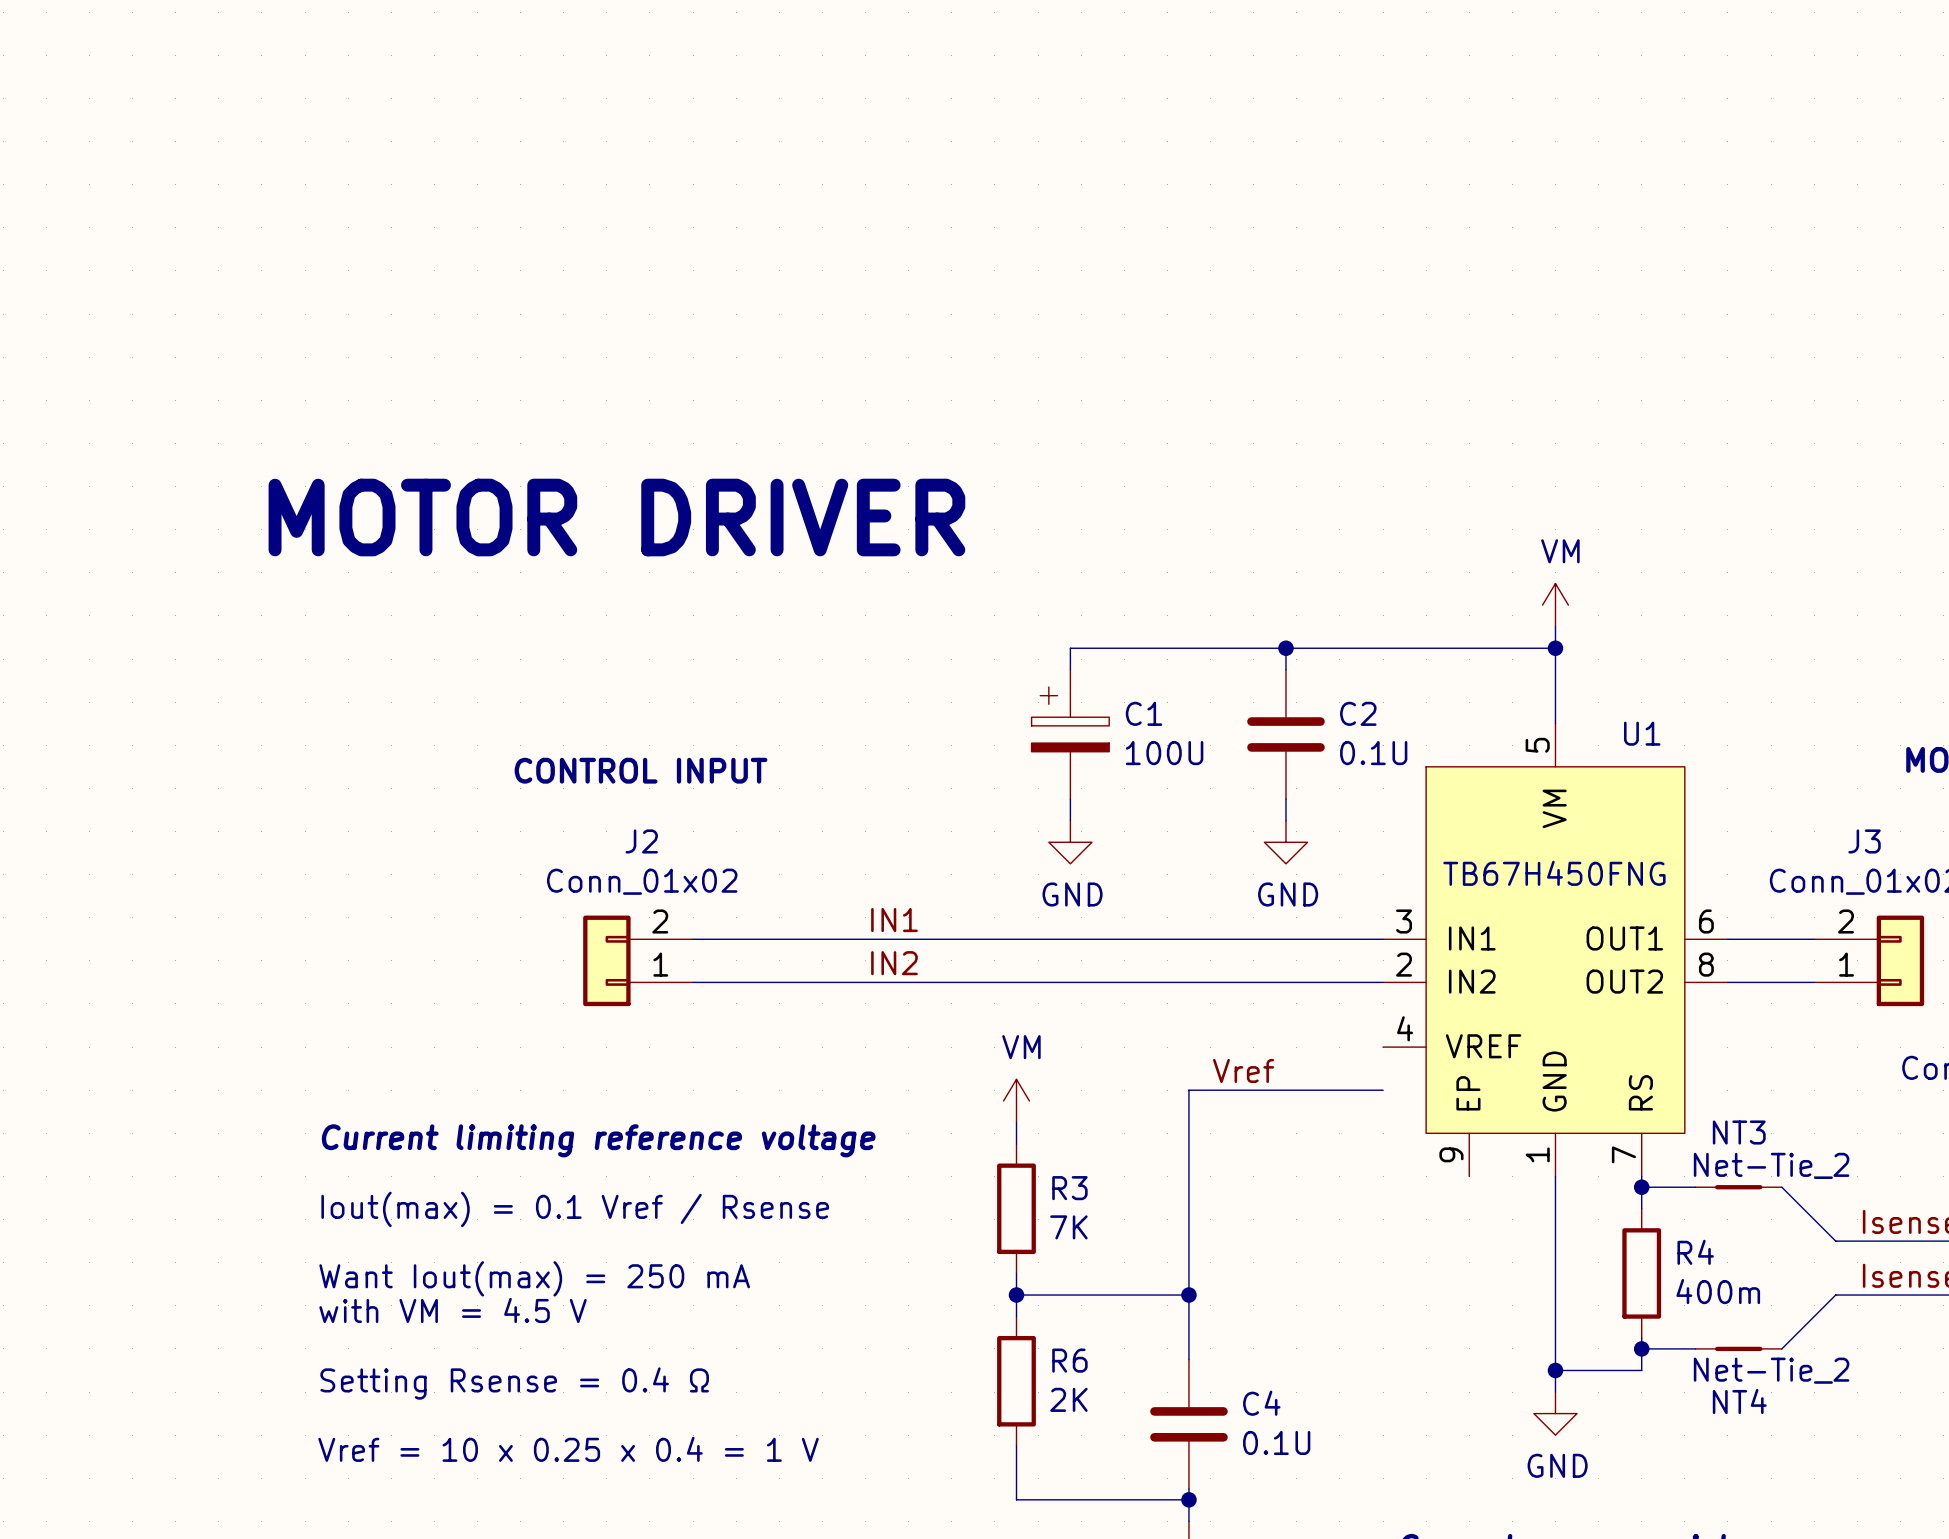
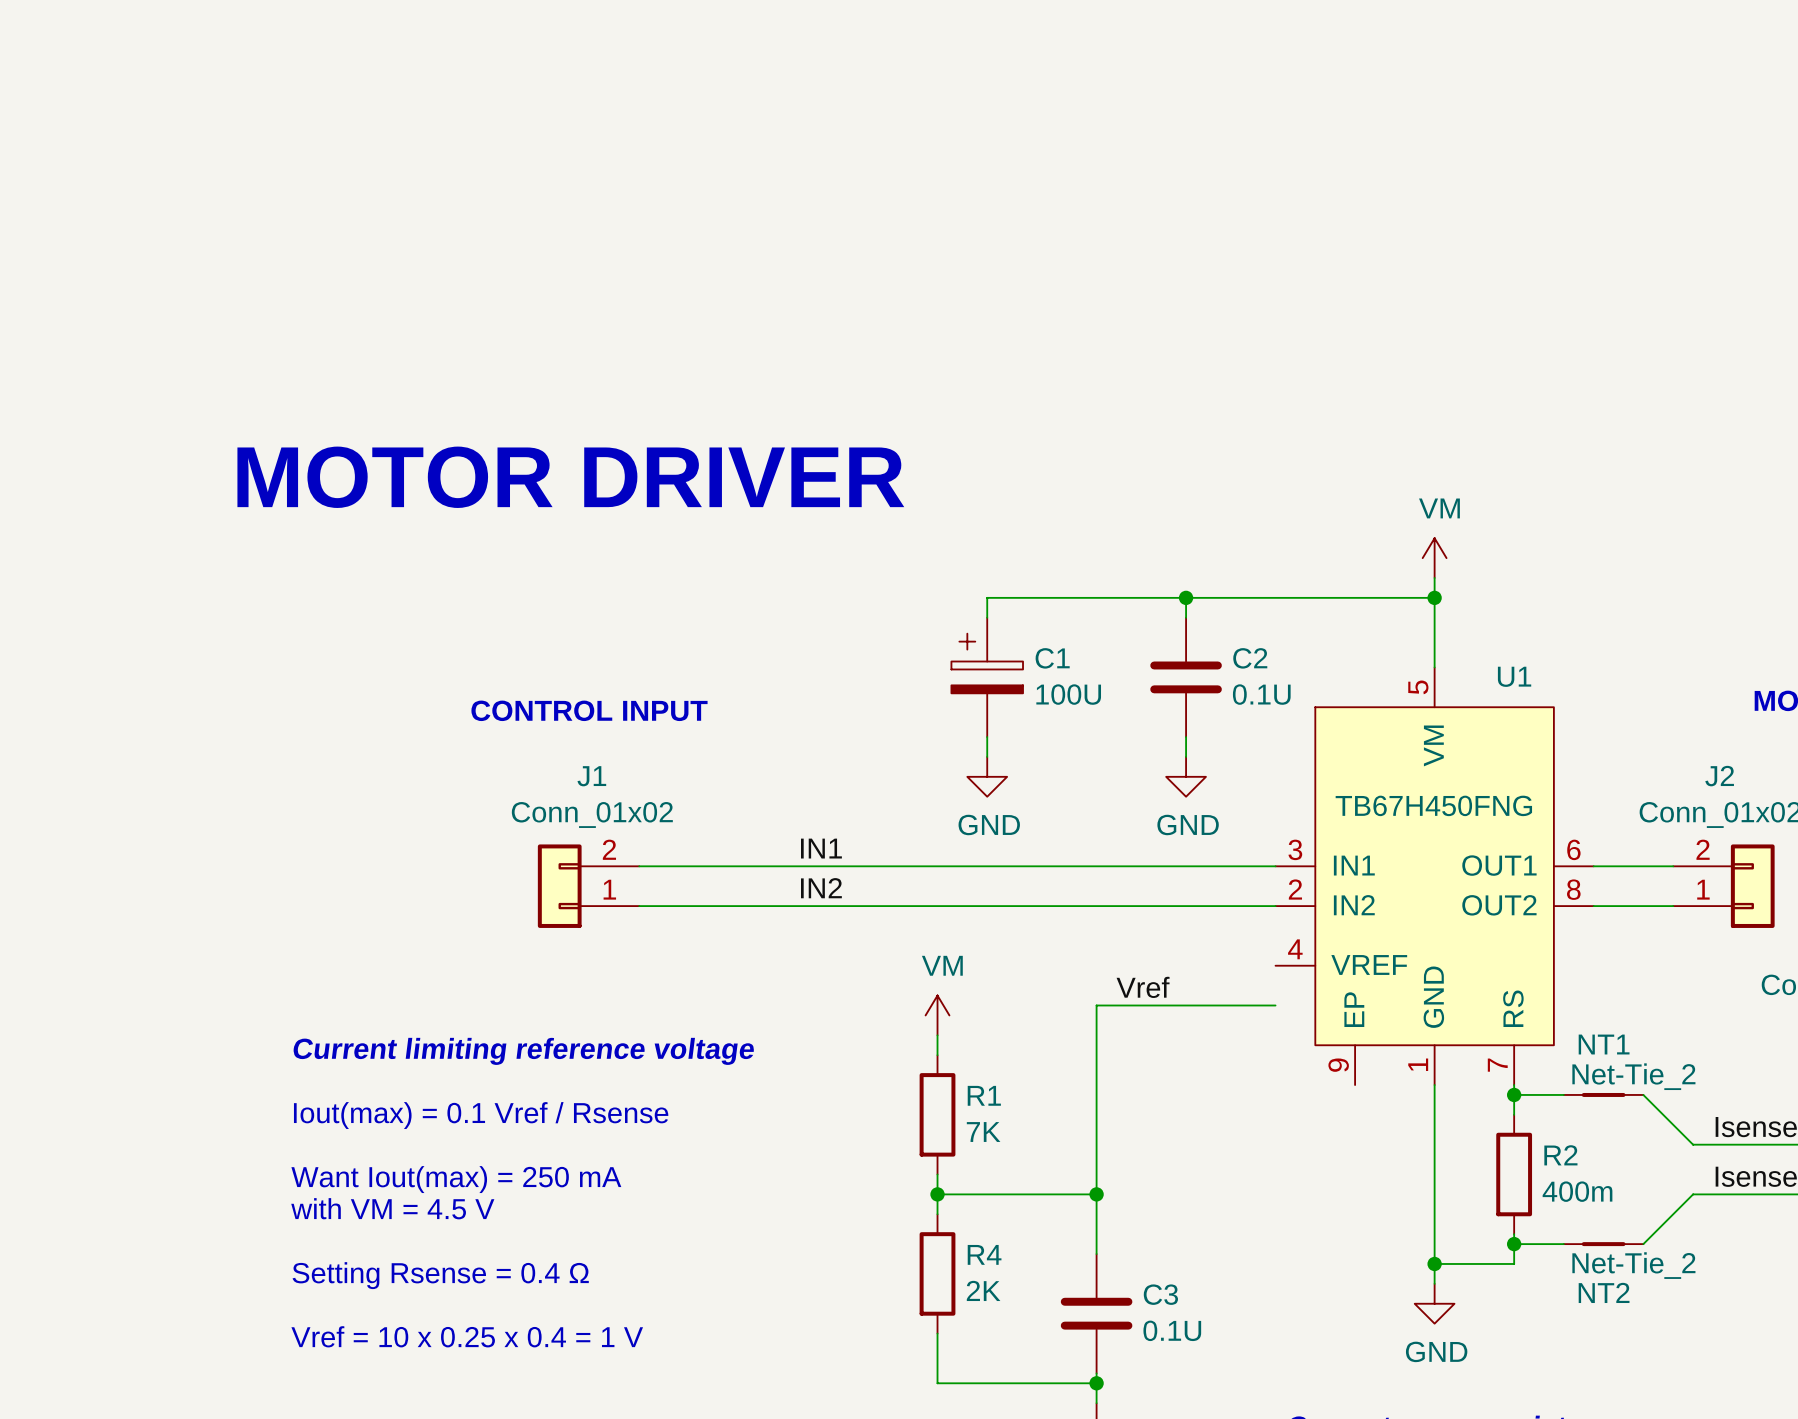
J2 name: J2 (641, 841) -> J1 (591, 776)
J3 name: J3 (1864, 841) -> J2 (1719, 776)
NT3 name: NT3 (1739, 1132) -> NT1 (1604, 1044)
R3 name: R3 (1069, 1188) -> R1 (984, 1095)
R4 name: R4 (1695, 1252) -> R2 (1560, 1155)
R6 name: R6 (1069, 1360) -> R4 (984, 1254)
NT4 name: NT4 (1739, 1401) -> NT2 (1604, 1292)
C4 name: C4 (1261, 1403) -> C3 (1160, 1294)

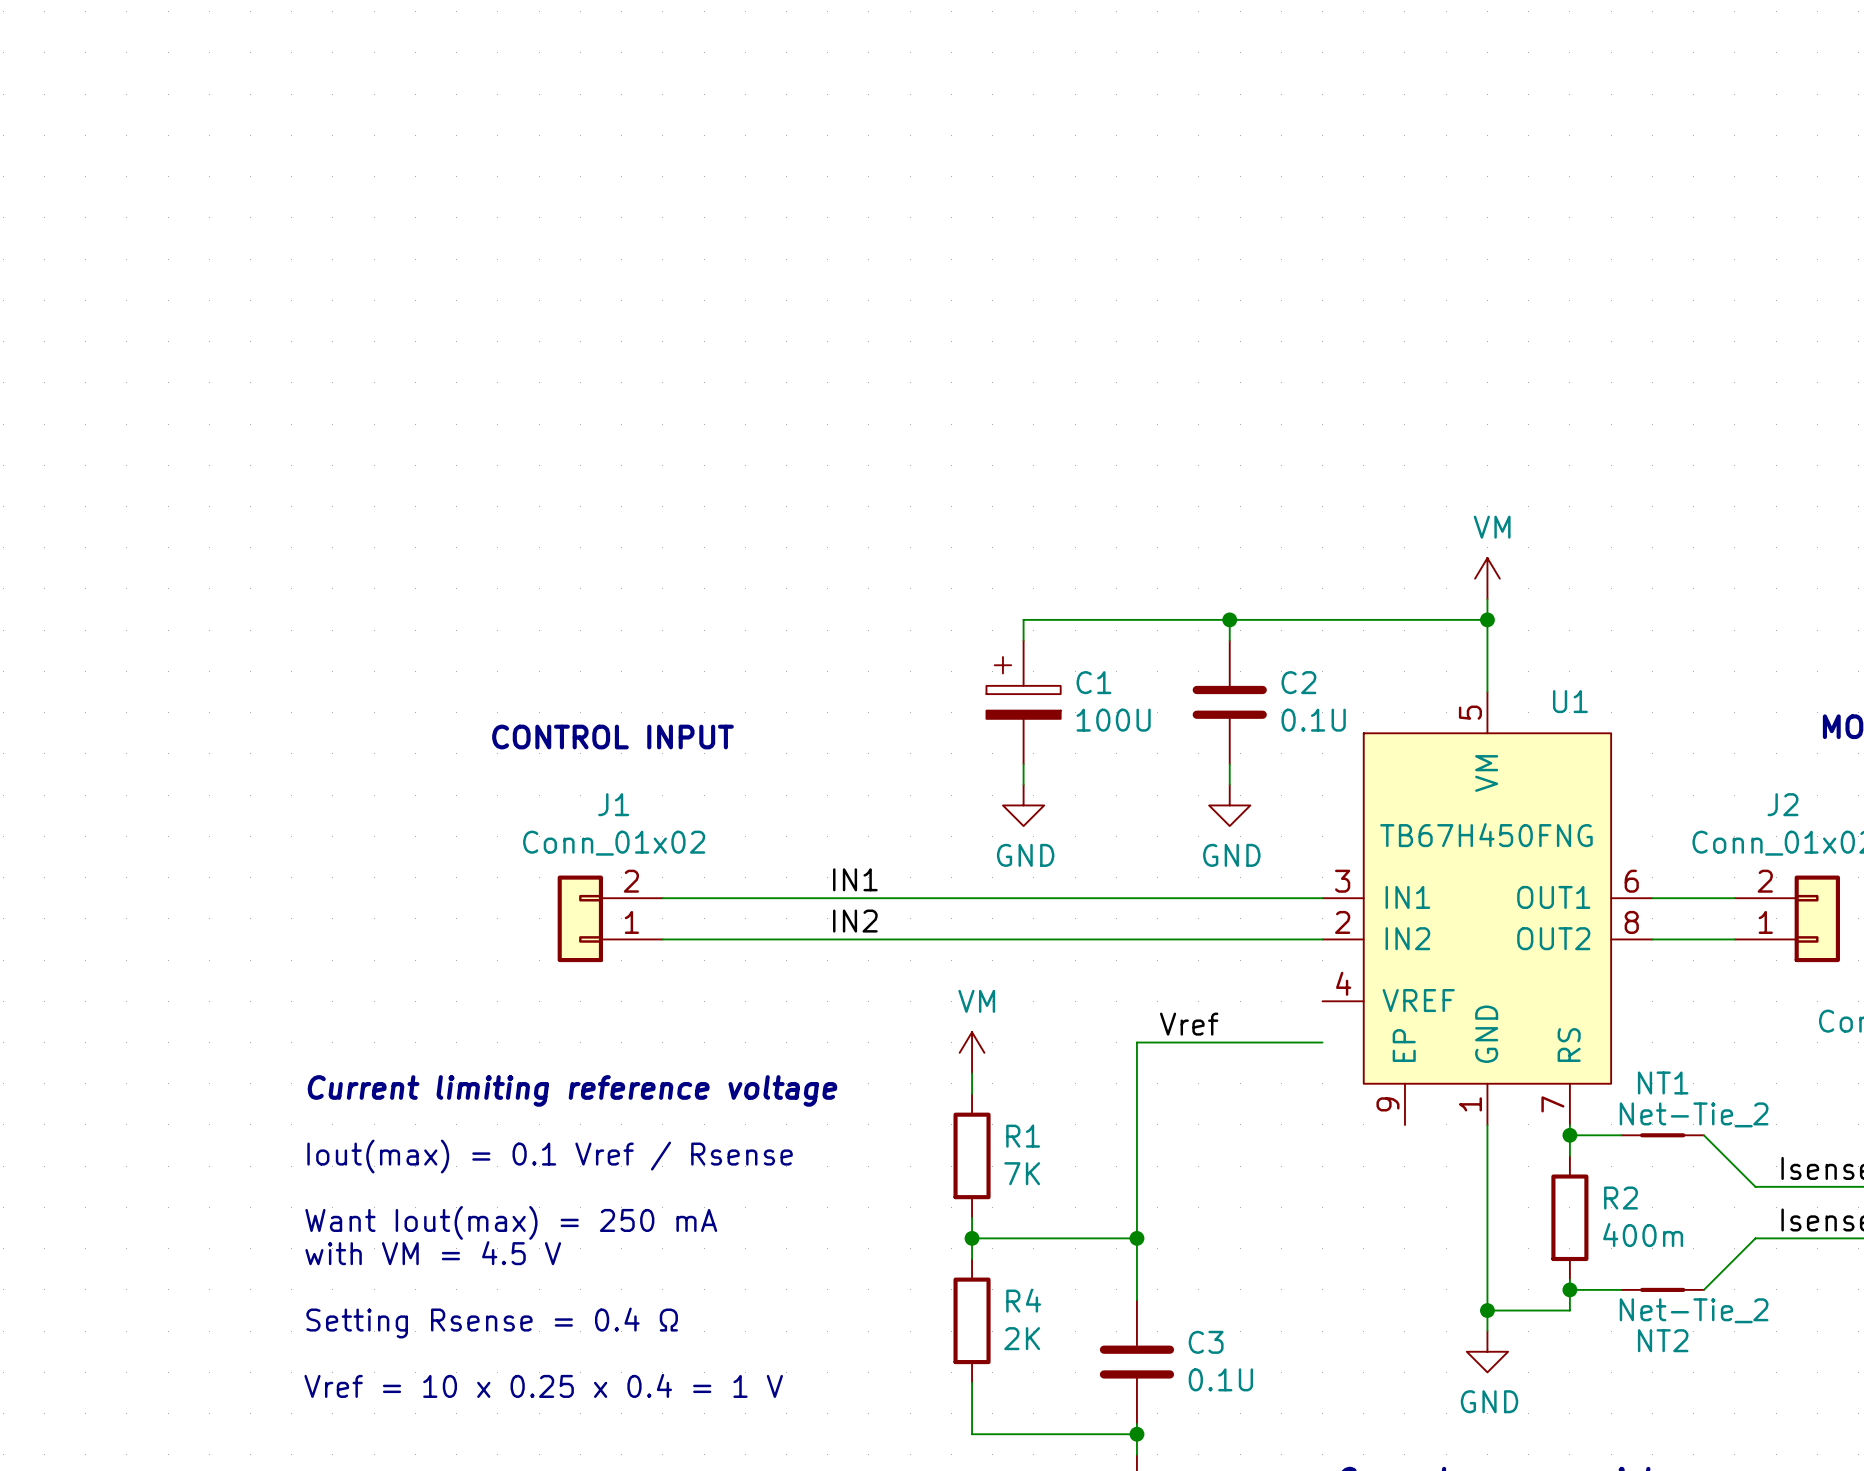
text: MOTOR DRIVER (570, 477) -> none

